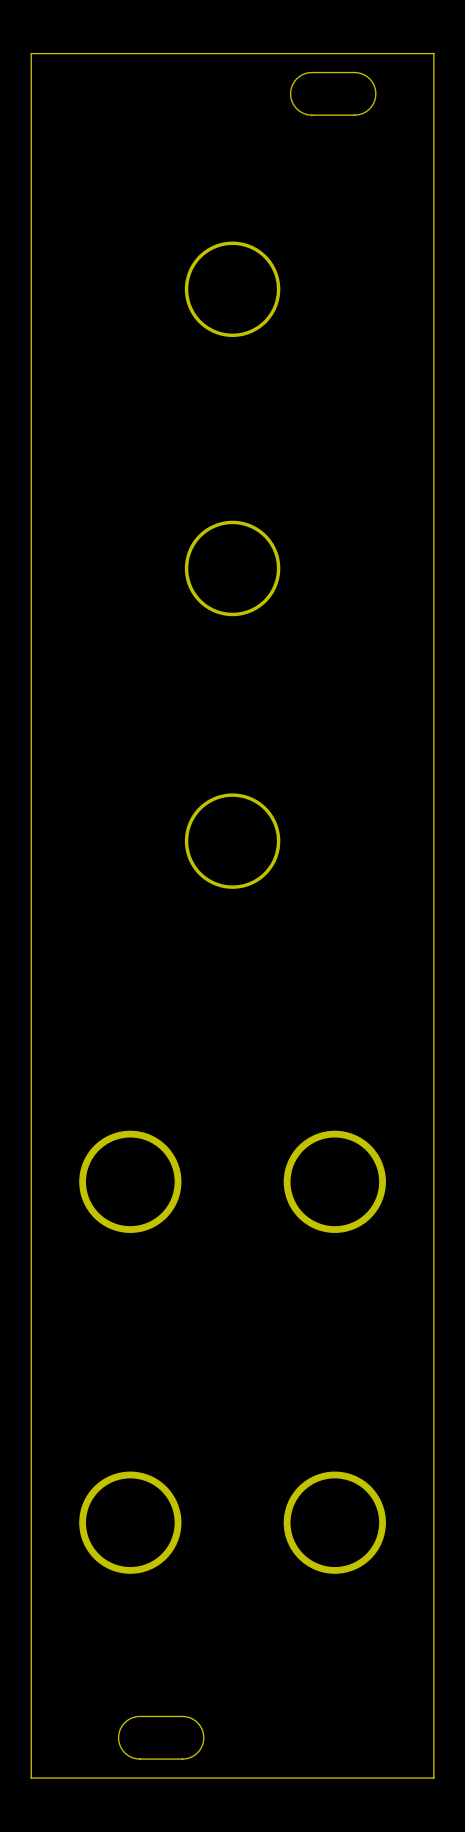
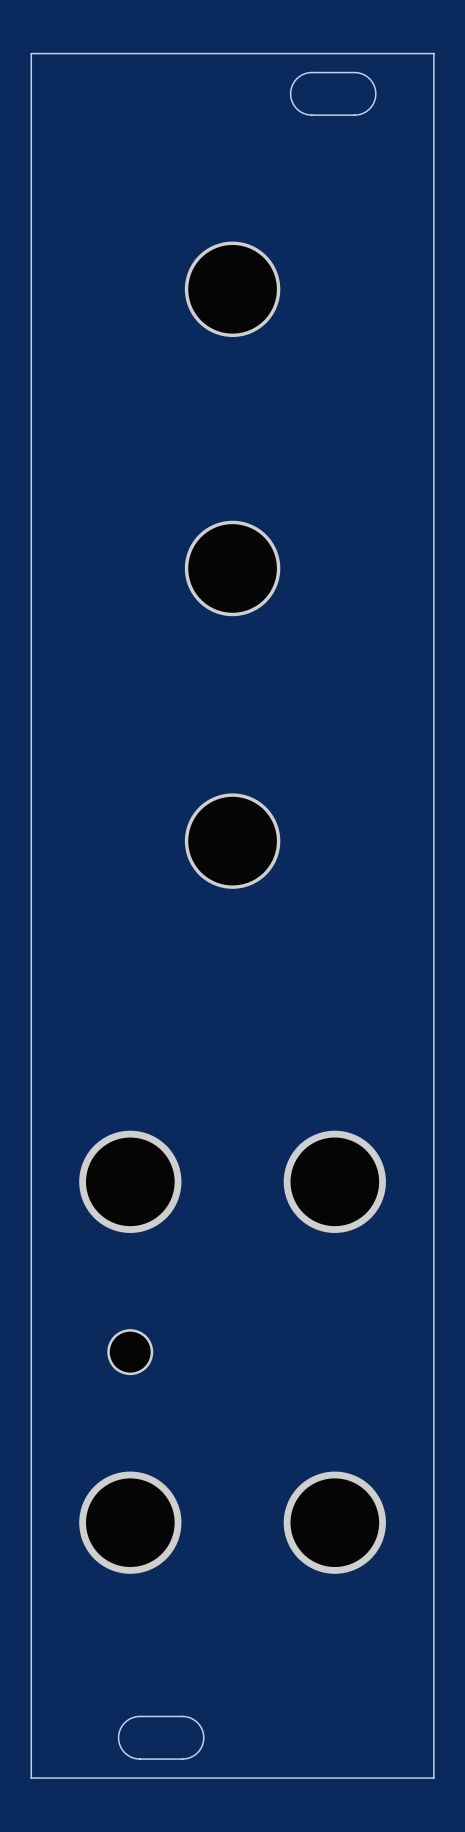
part: none -> (130, 1352)

